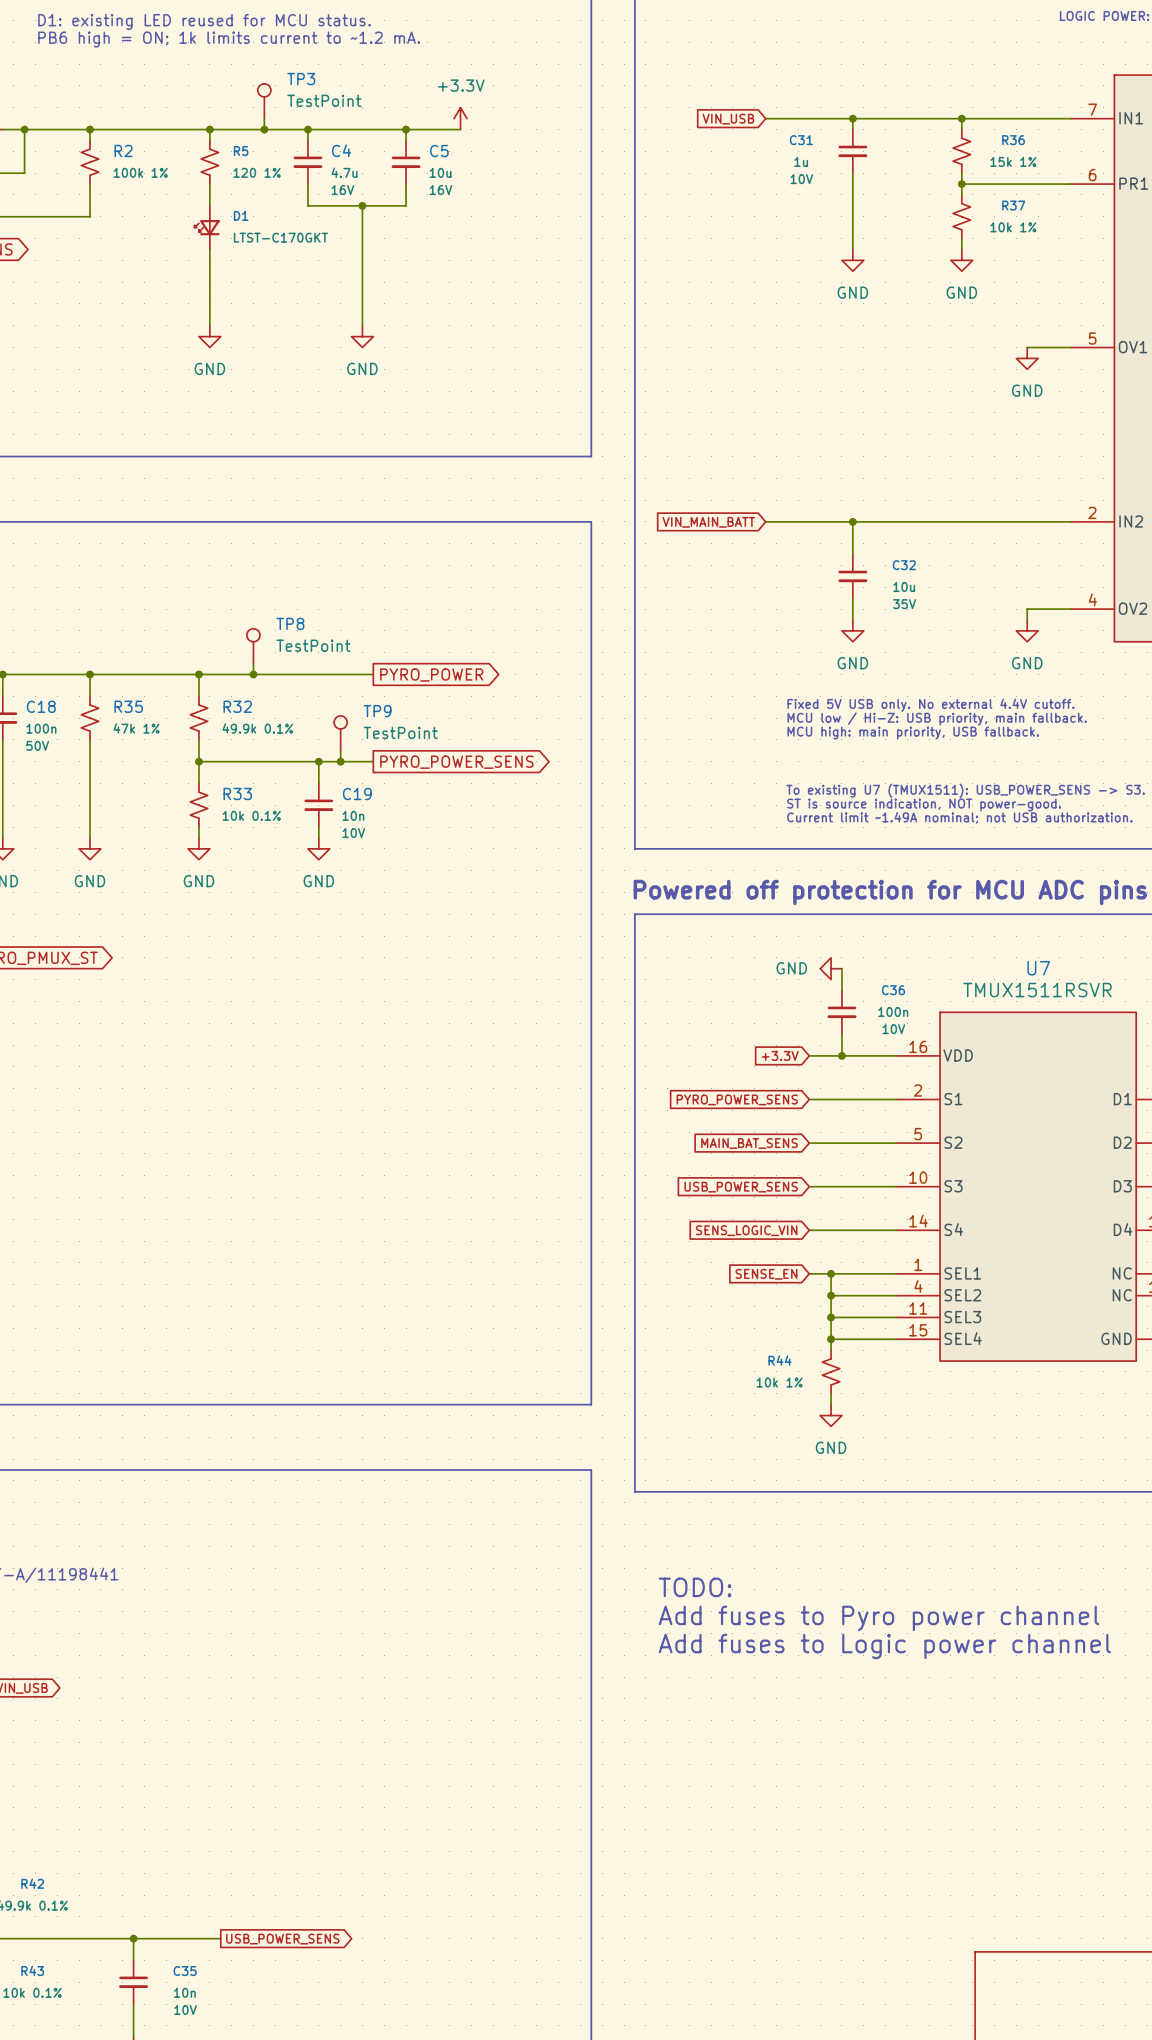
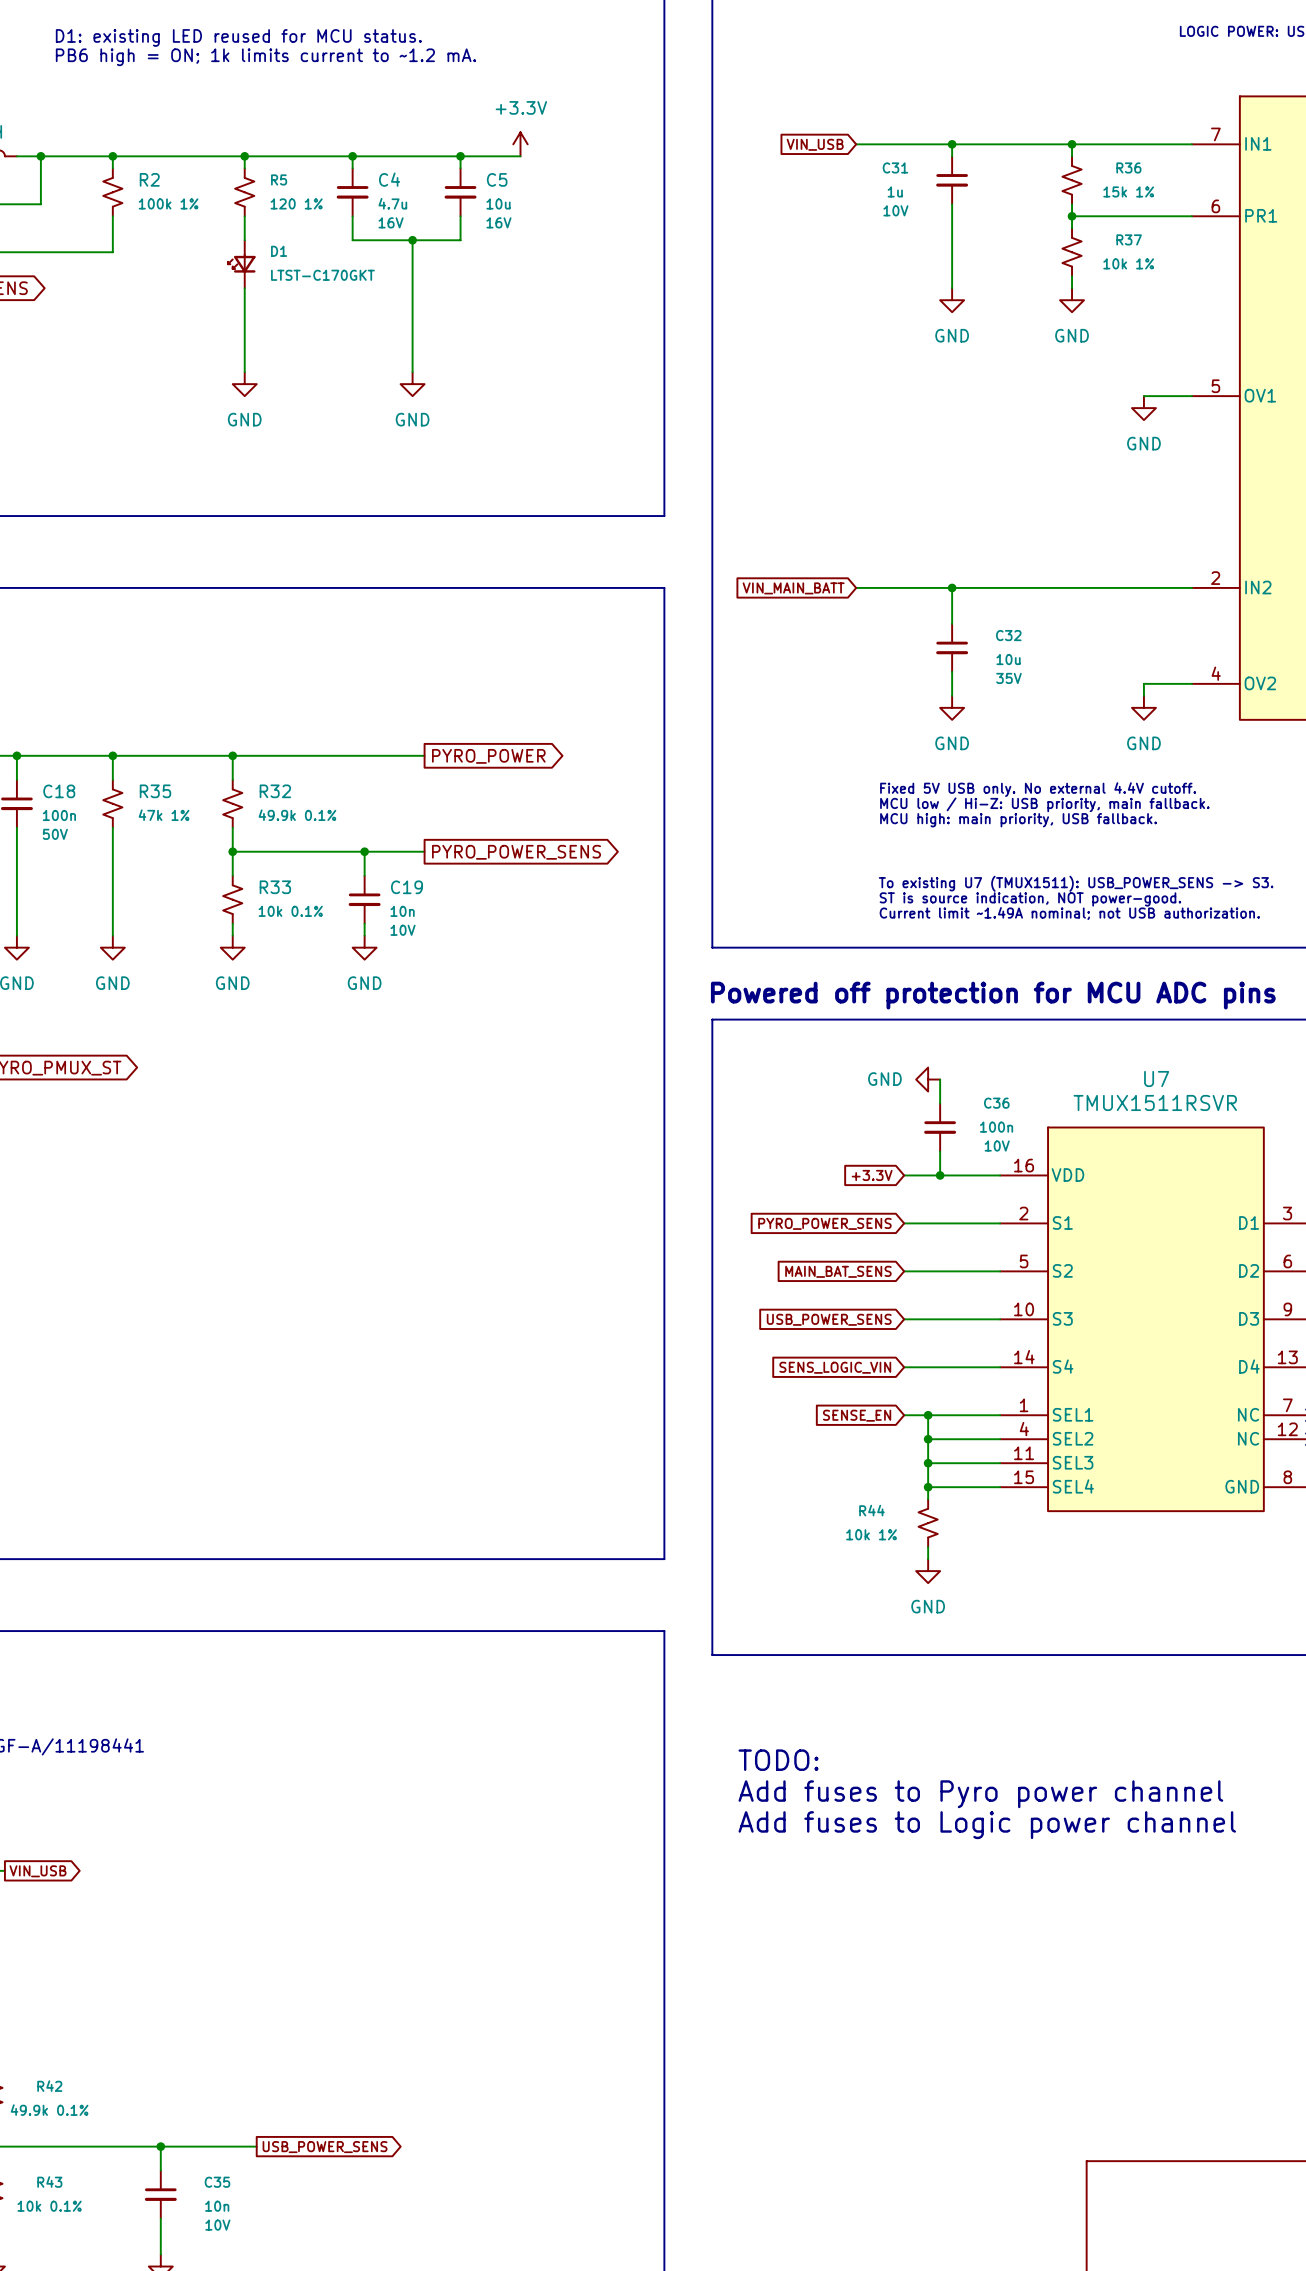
TP3: TestPoint (264, 101) -> none
wire: (264, 118) (264, 129) -> none
junction: (264, 129) -> none
TP8: TestPoint (253, 646) -> none
wire: (253, 663) (253, 674) -> none
junction: (253, 674) -> none
TP9: TestPoint (340, 733) -> none
wire: (340, 750) (340, 761) -> none
junction: (340, 761) -> none

